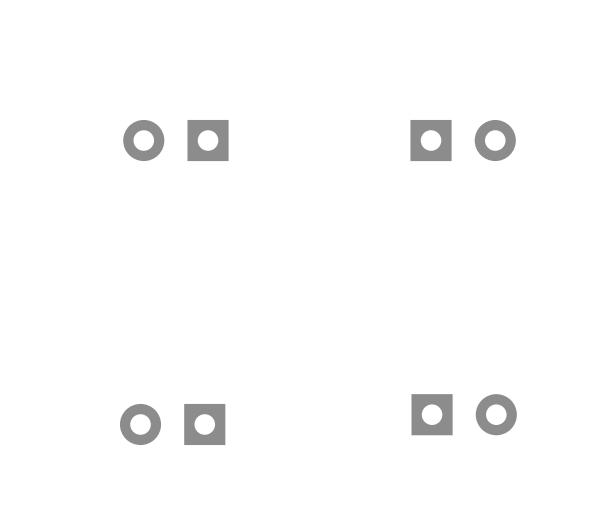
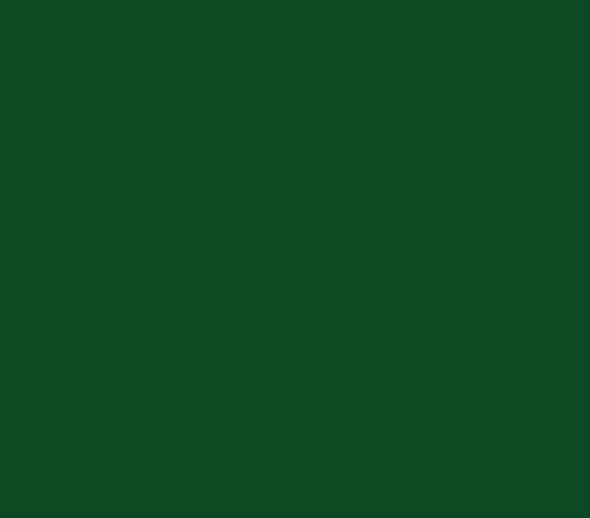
part: (175, 140) -> none
part: (463, 140) -> none
part: (464, 414) -> none
part: (172, 424) -> none

